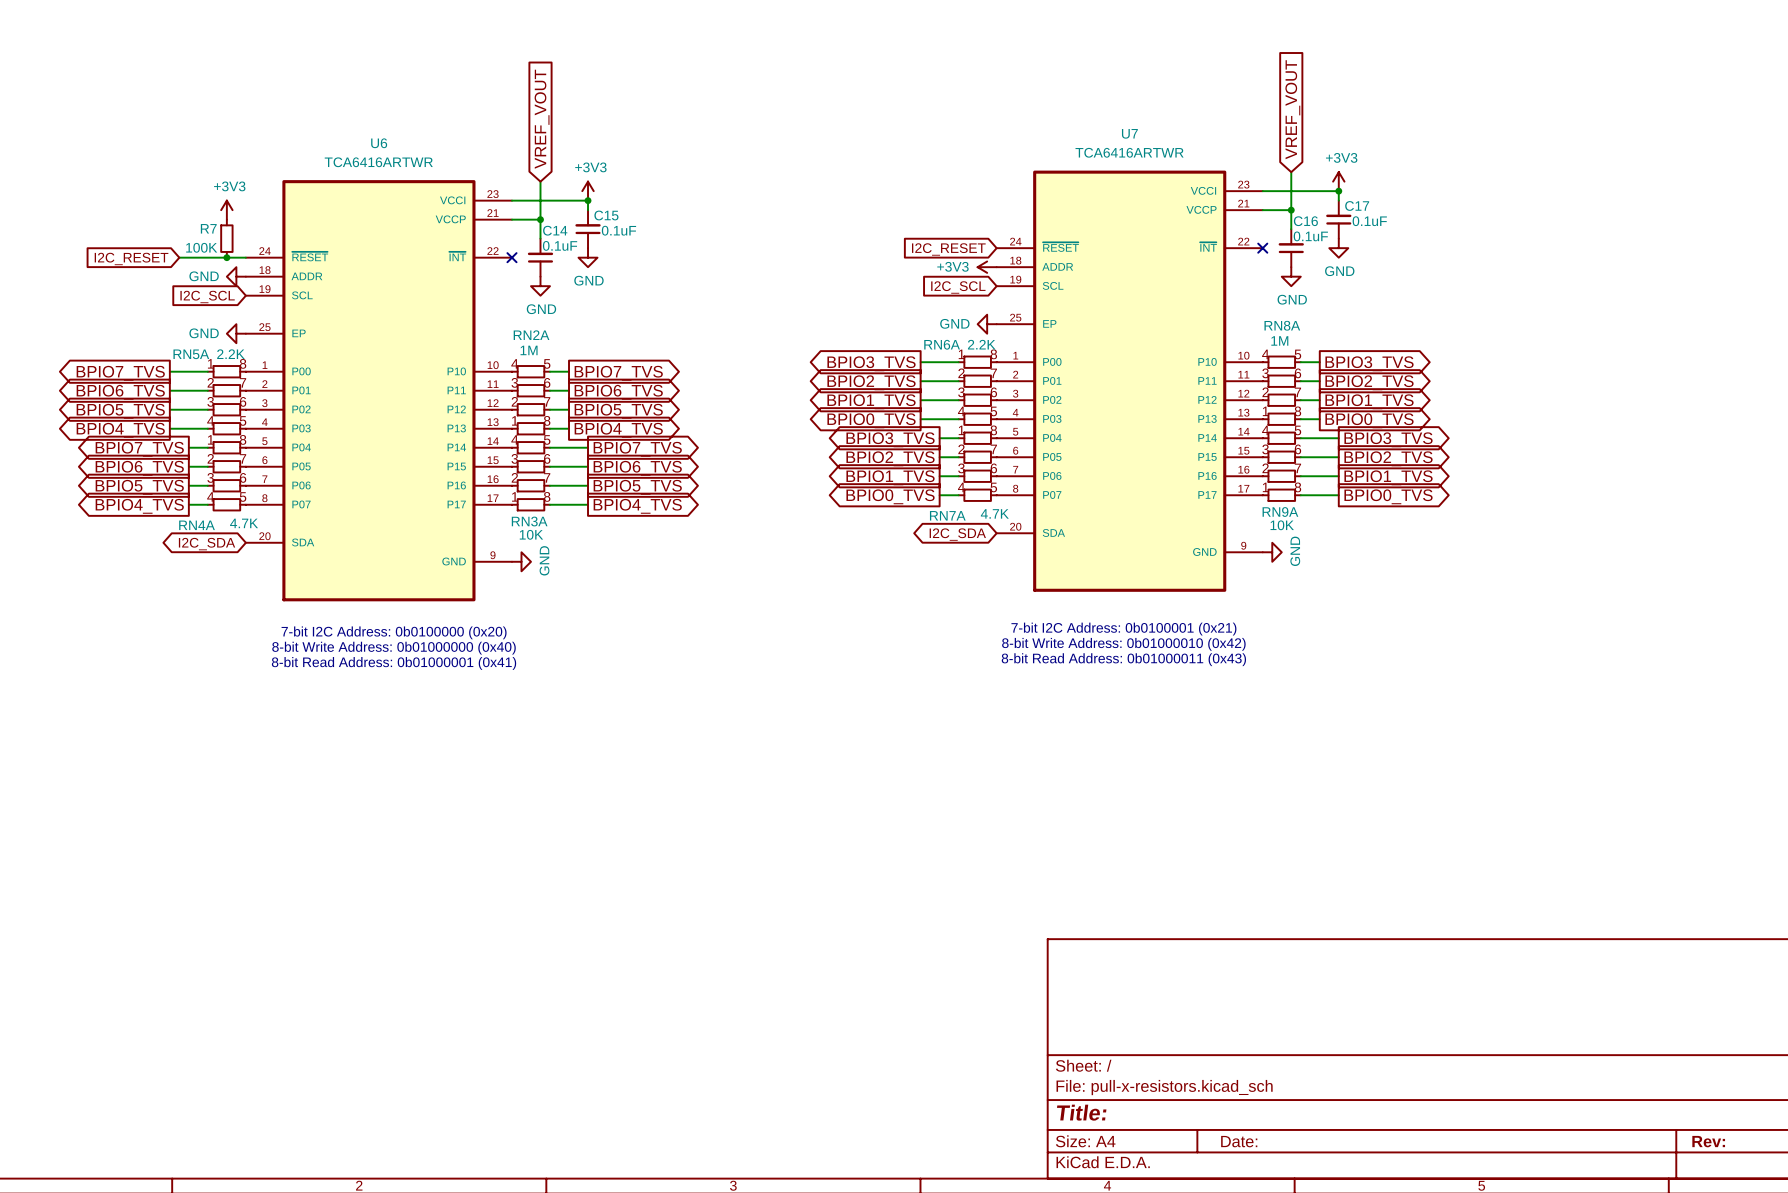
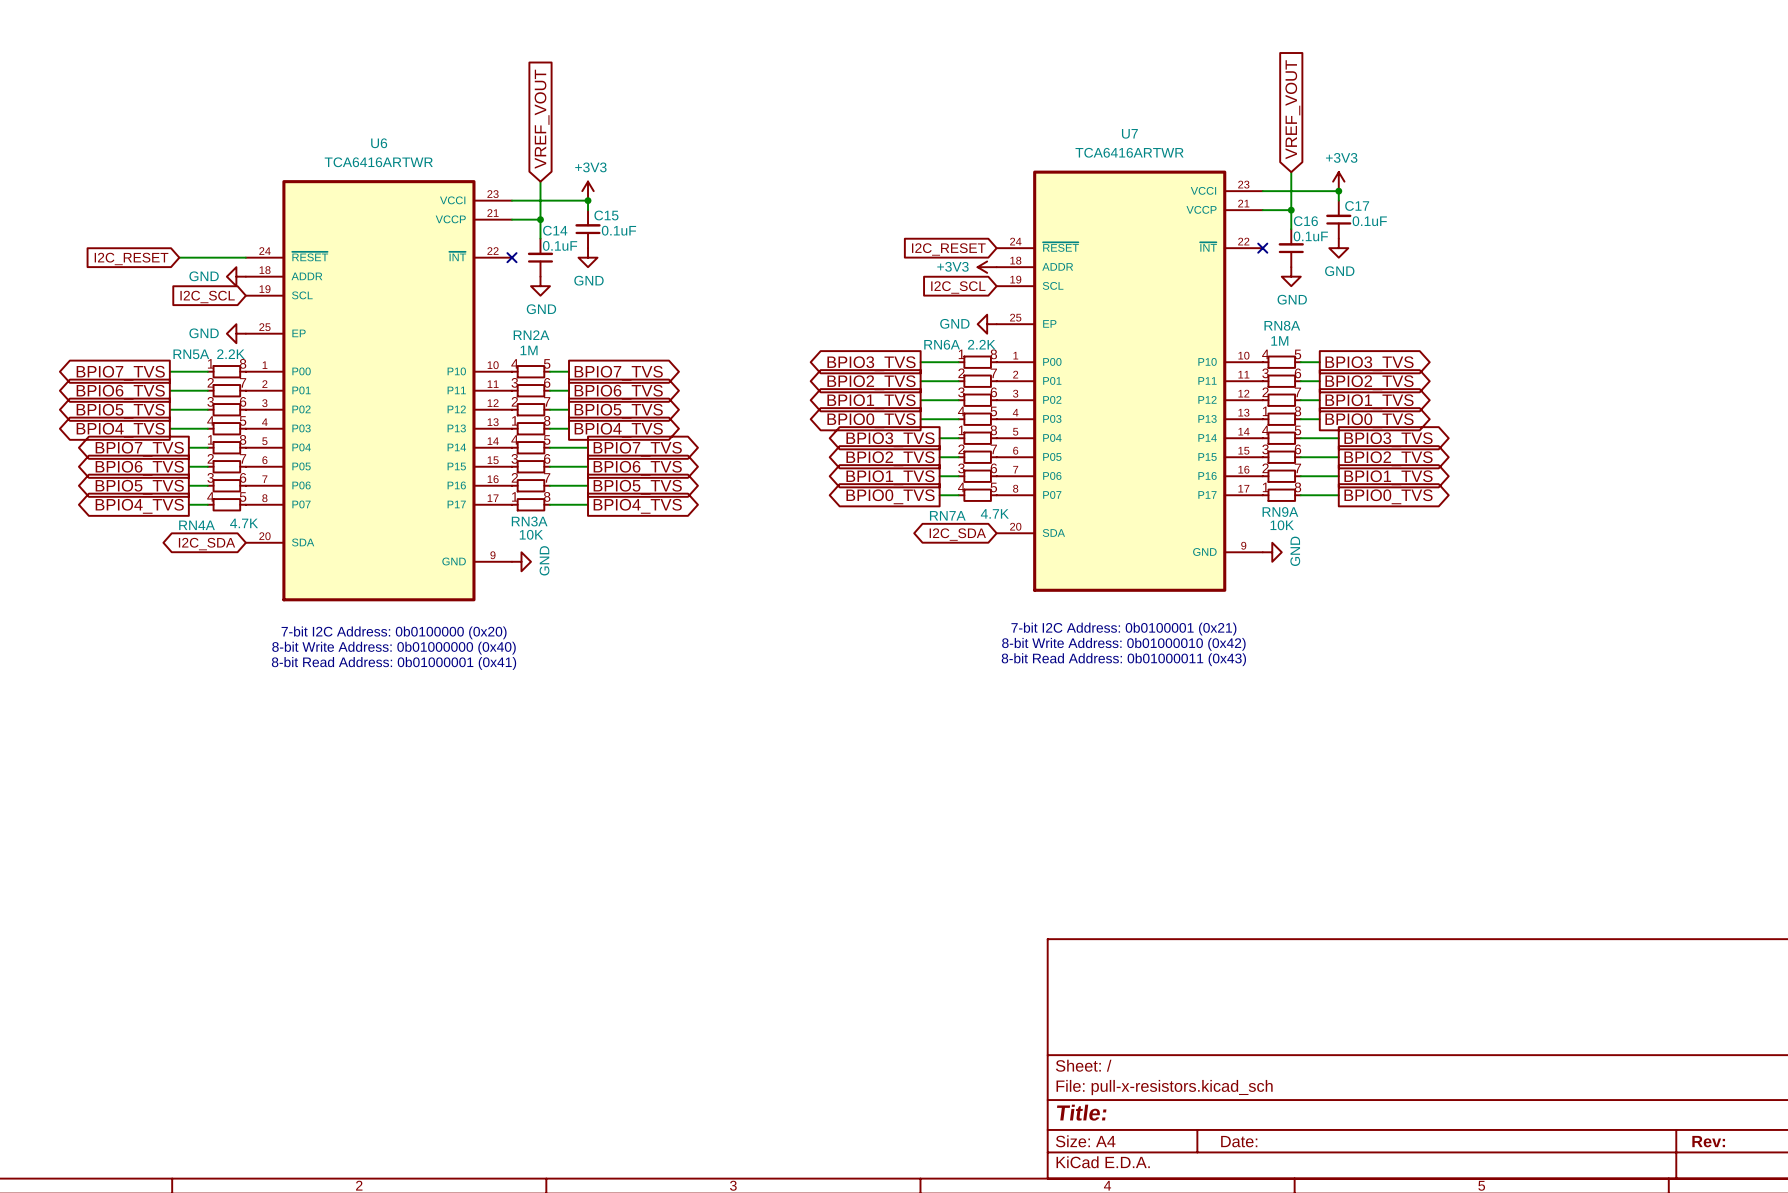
power symbol: +3V3 (226, 210) -> none
R7: 100K (226, 238) -> none
junction: (226, 257) -> none

